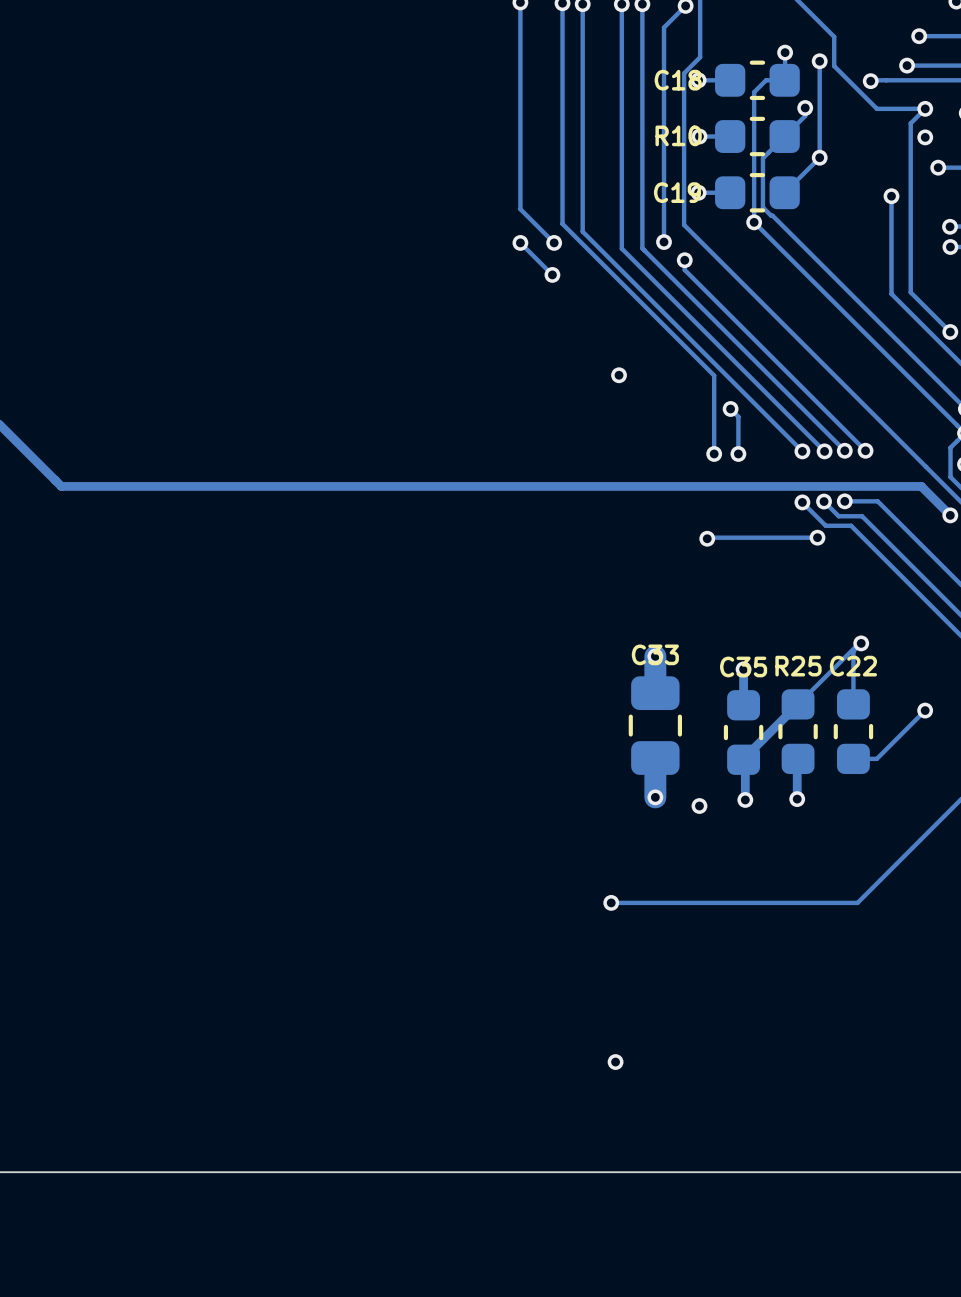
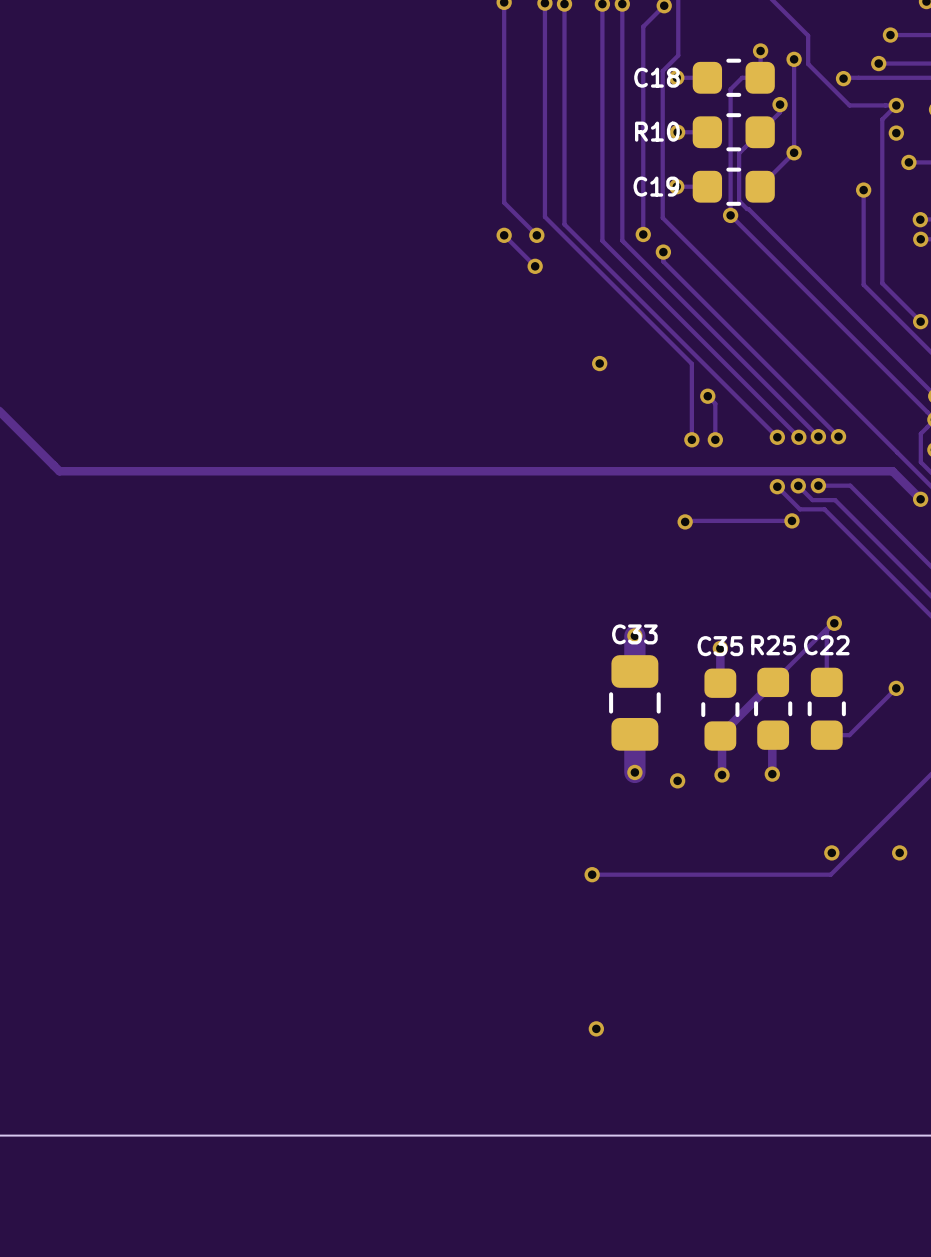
via: none -> (831, 852)
via: none -> (899, 852)

